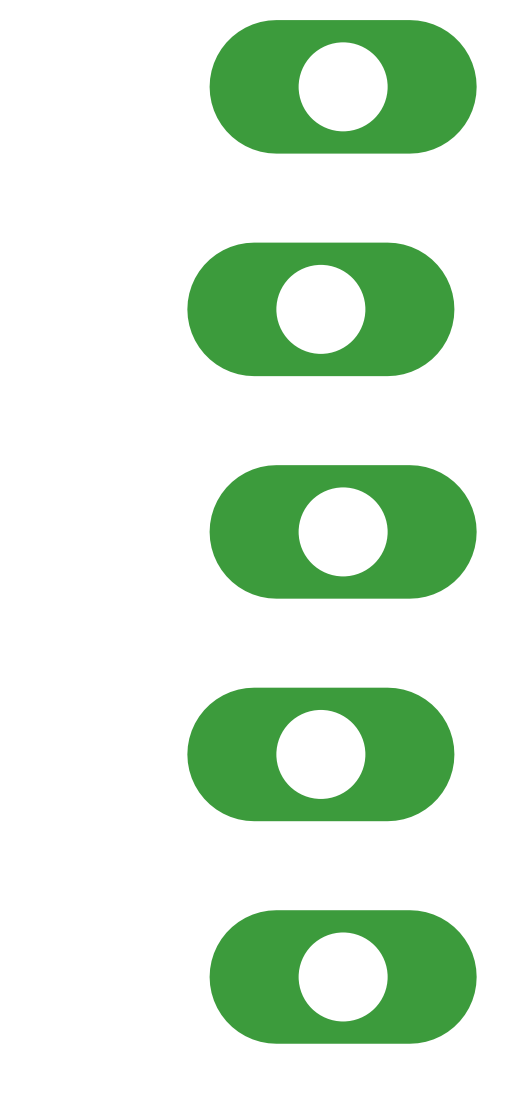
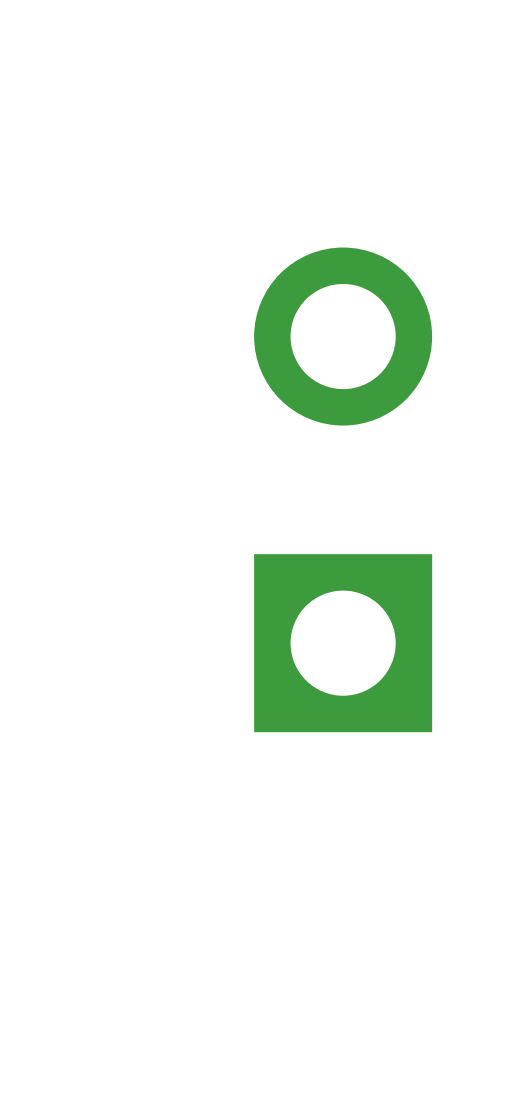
part footprint: [187, 20, 477, 1044] -> [254, 247, 433, 733]

